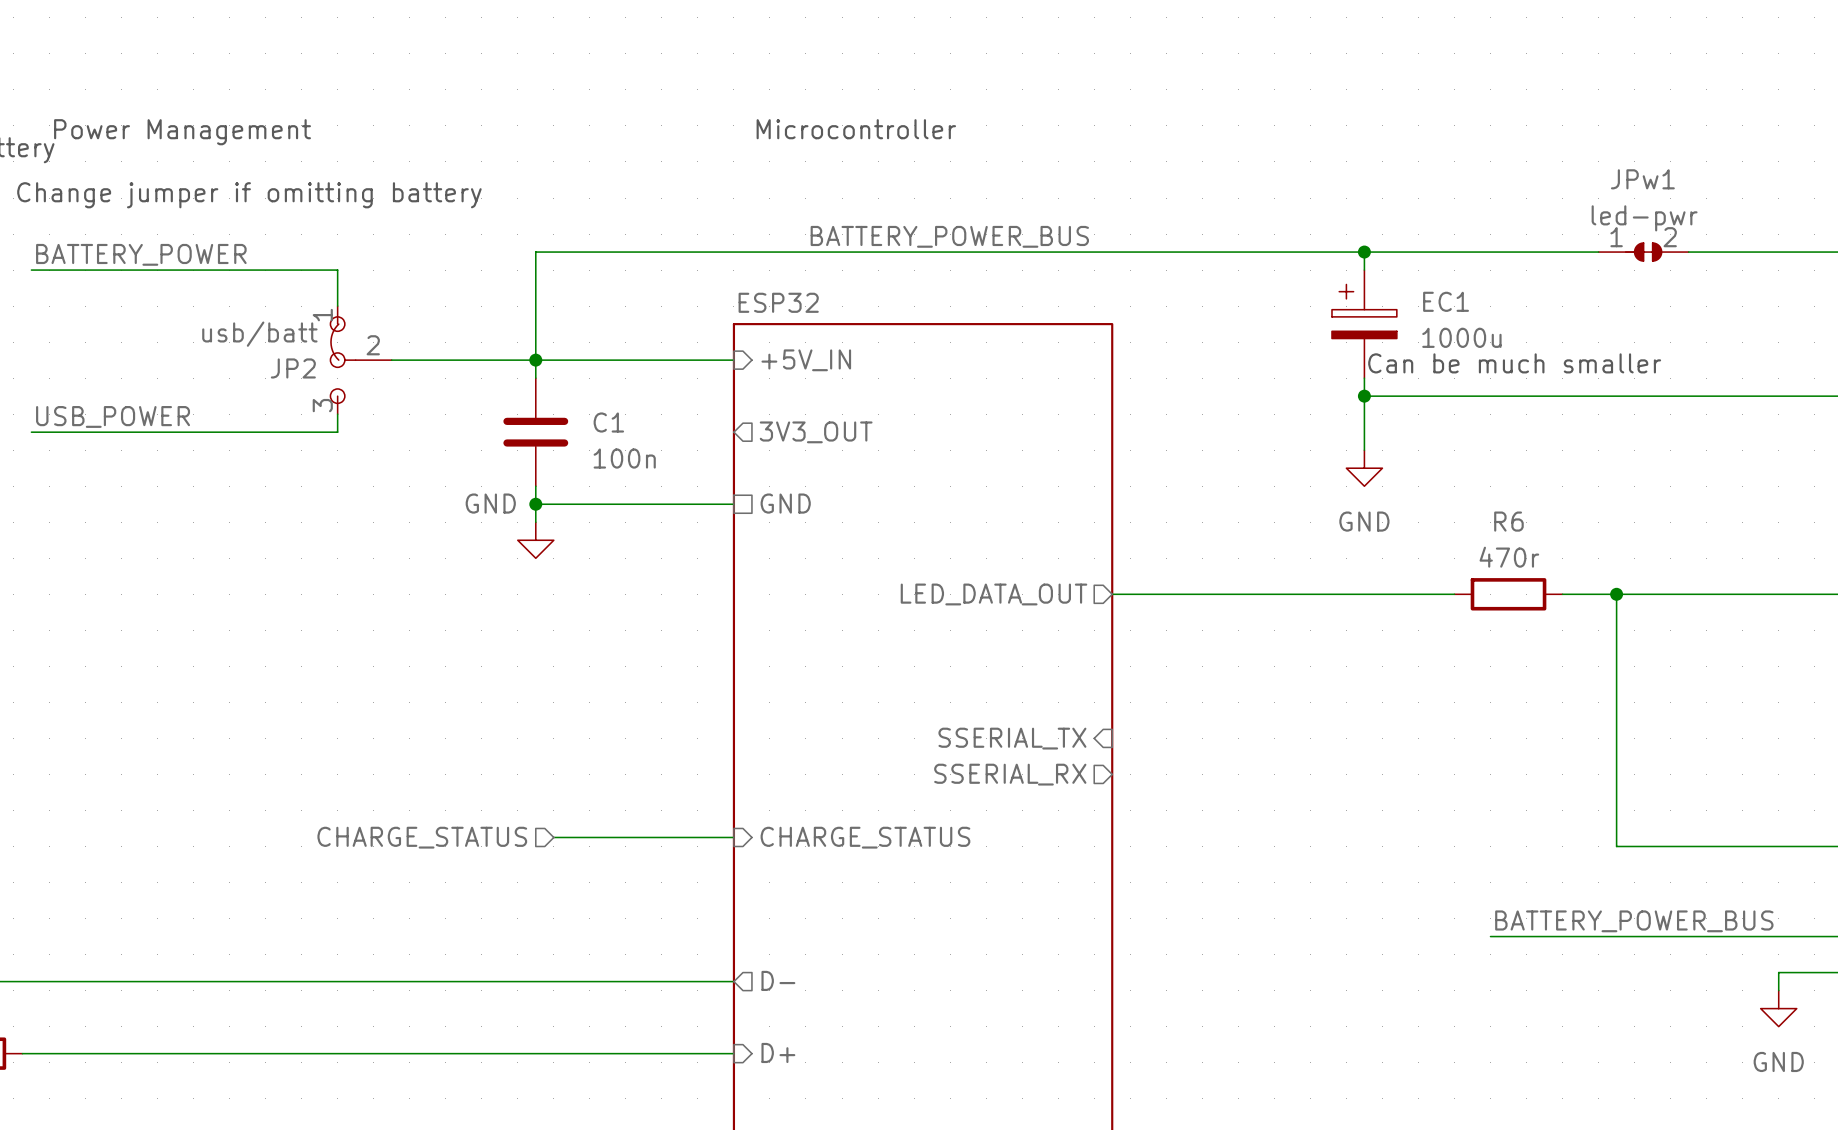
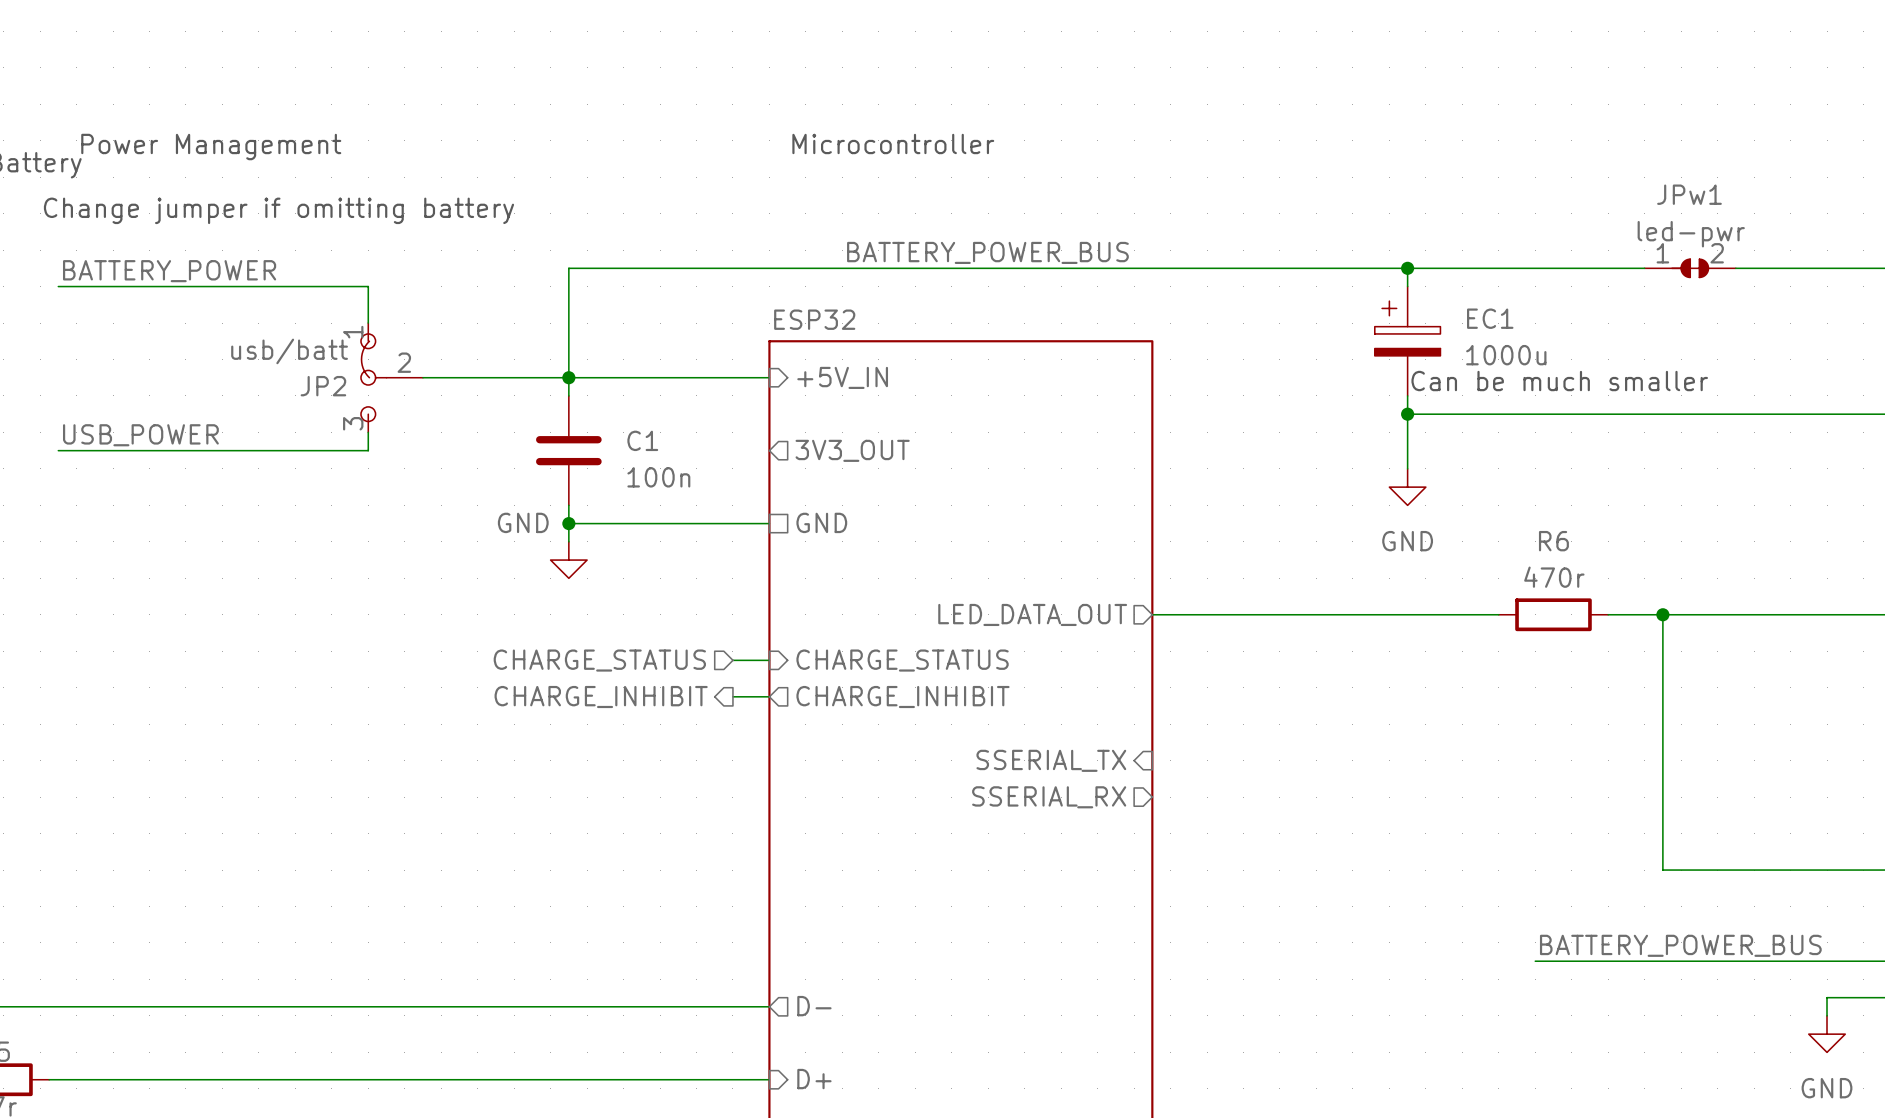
wire: none -> (732, 660) (769, 660)
hierarchical label: none -> CHARGE_INHIBIT (601, 697)
wire: none -> (732, 696) (769, 696)
sheet pin: none -> CHARGE_INHIBIT (902, 697)
hierarchical label position: CHARGE_STATUS (422, 837) -> CHARGE_STATUS (599, 660)
wire: (553, 837) (733, 837) -> none
sheet pin position: CHARGE_STATUS (865, 837) -> CHARGE_STATUS (902, 660)

